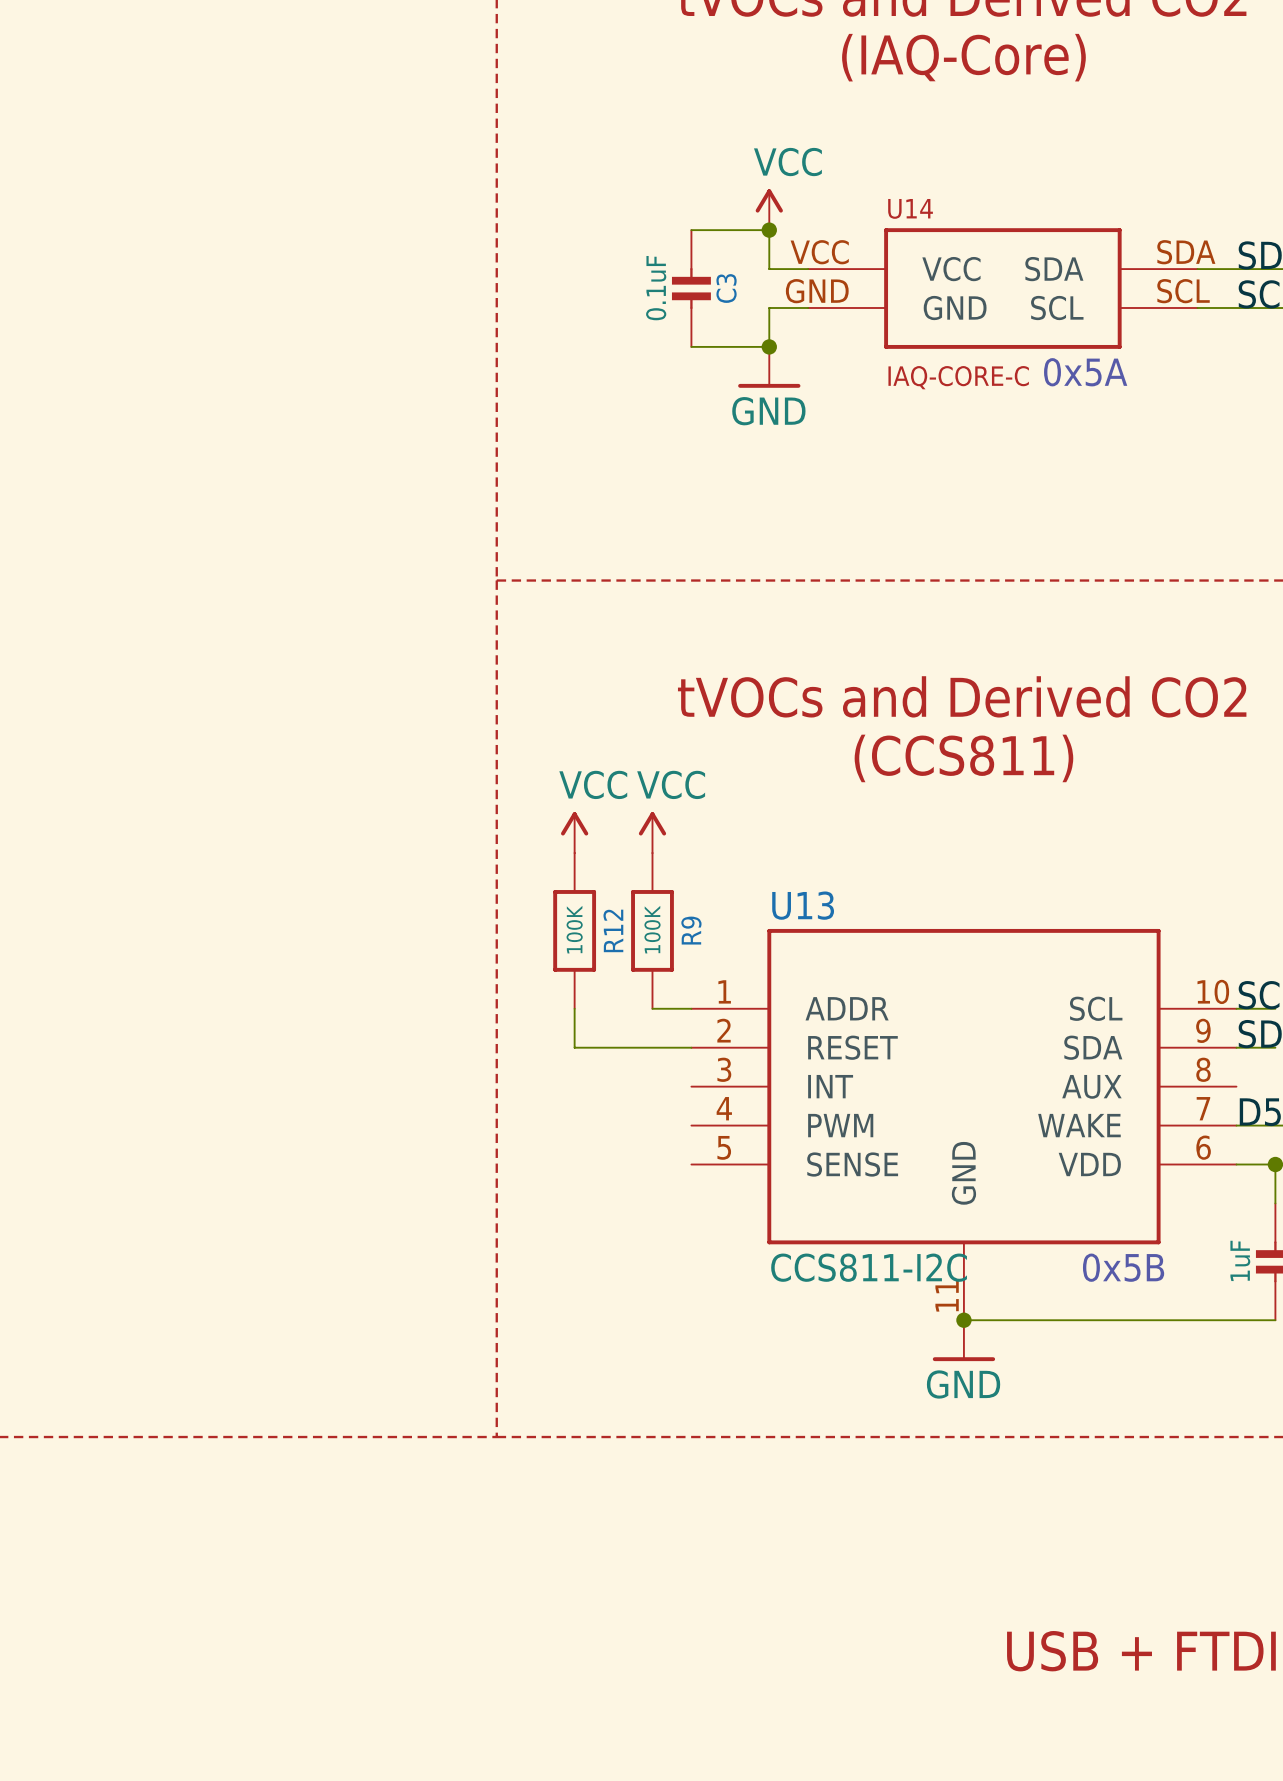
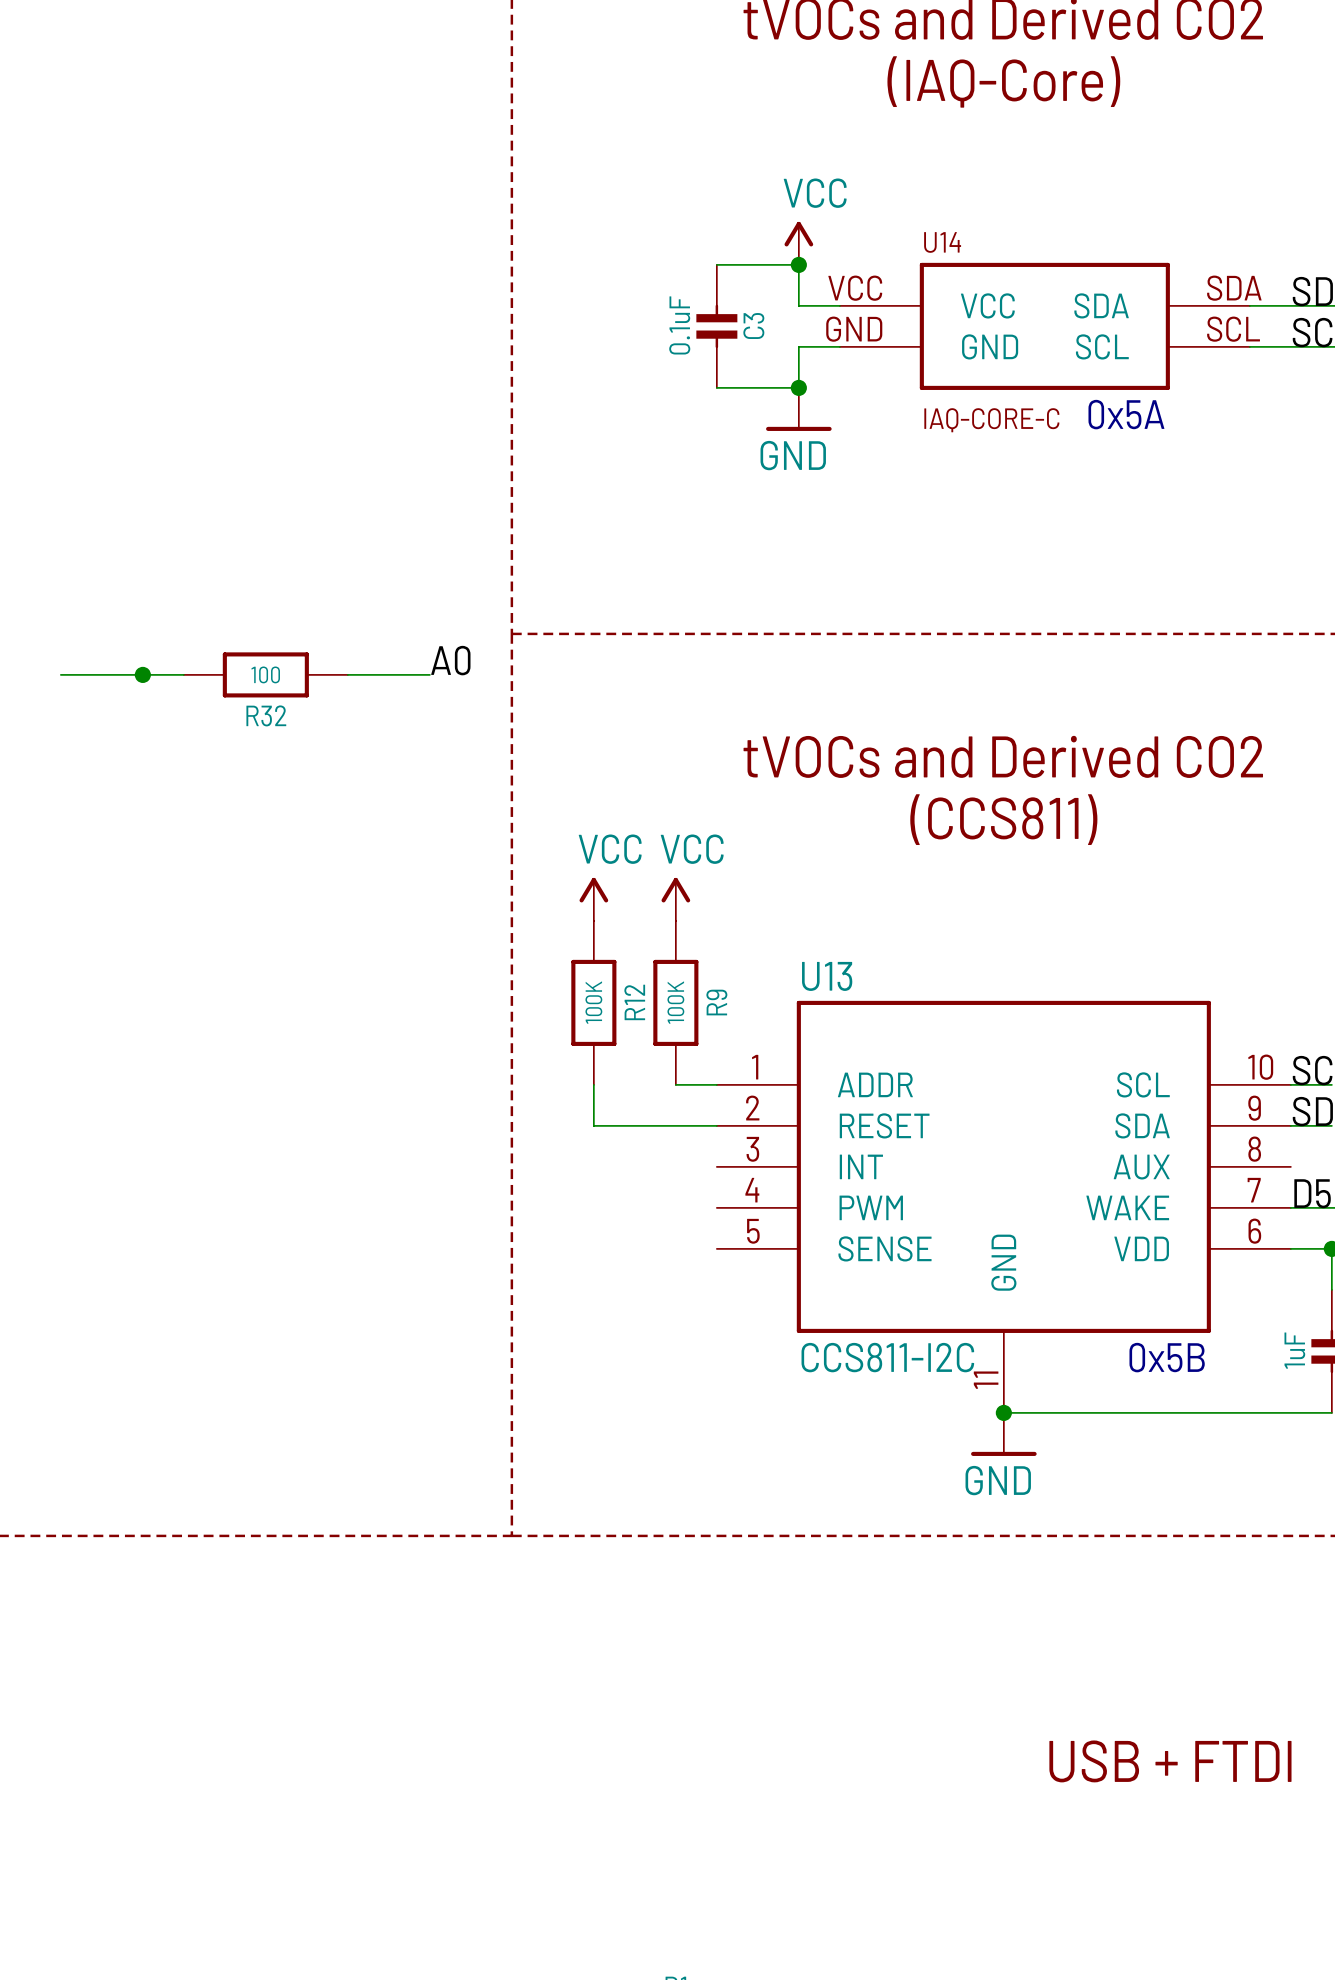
label: none -> A0 (450, 660)
wire: none -> (60, 674) (183, 674)
junction: none -> (142, 674)
R32: none -> 100 (265, 674)
wire: none -> (347, 674) (429, 674)

